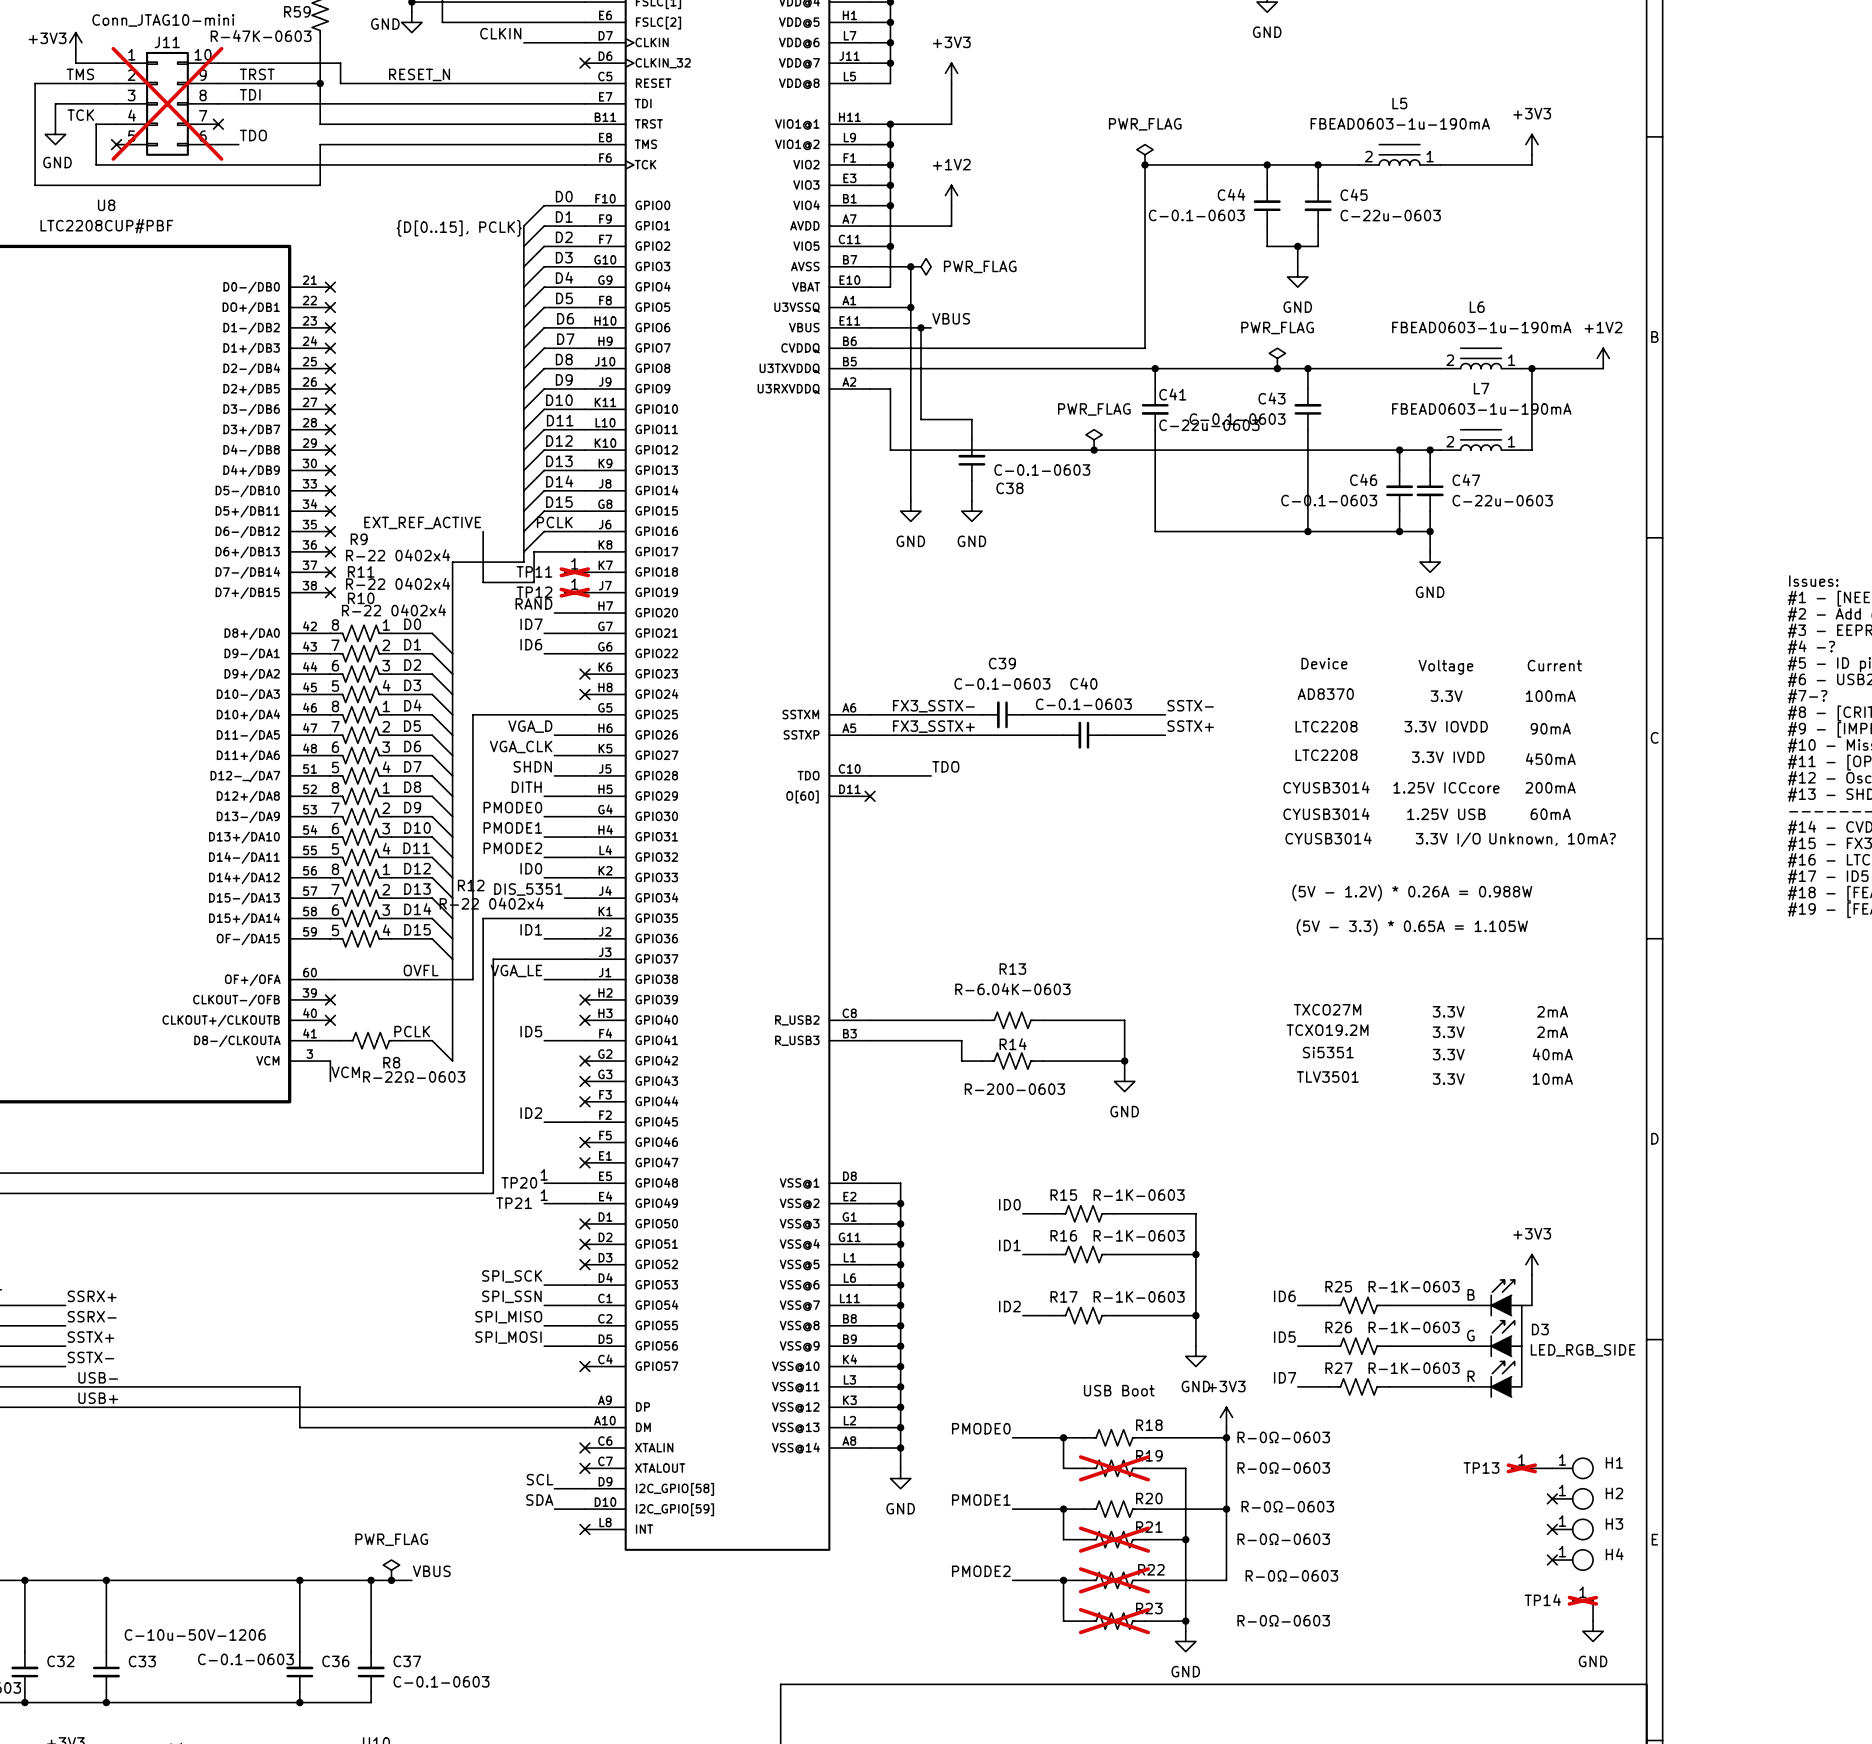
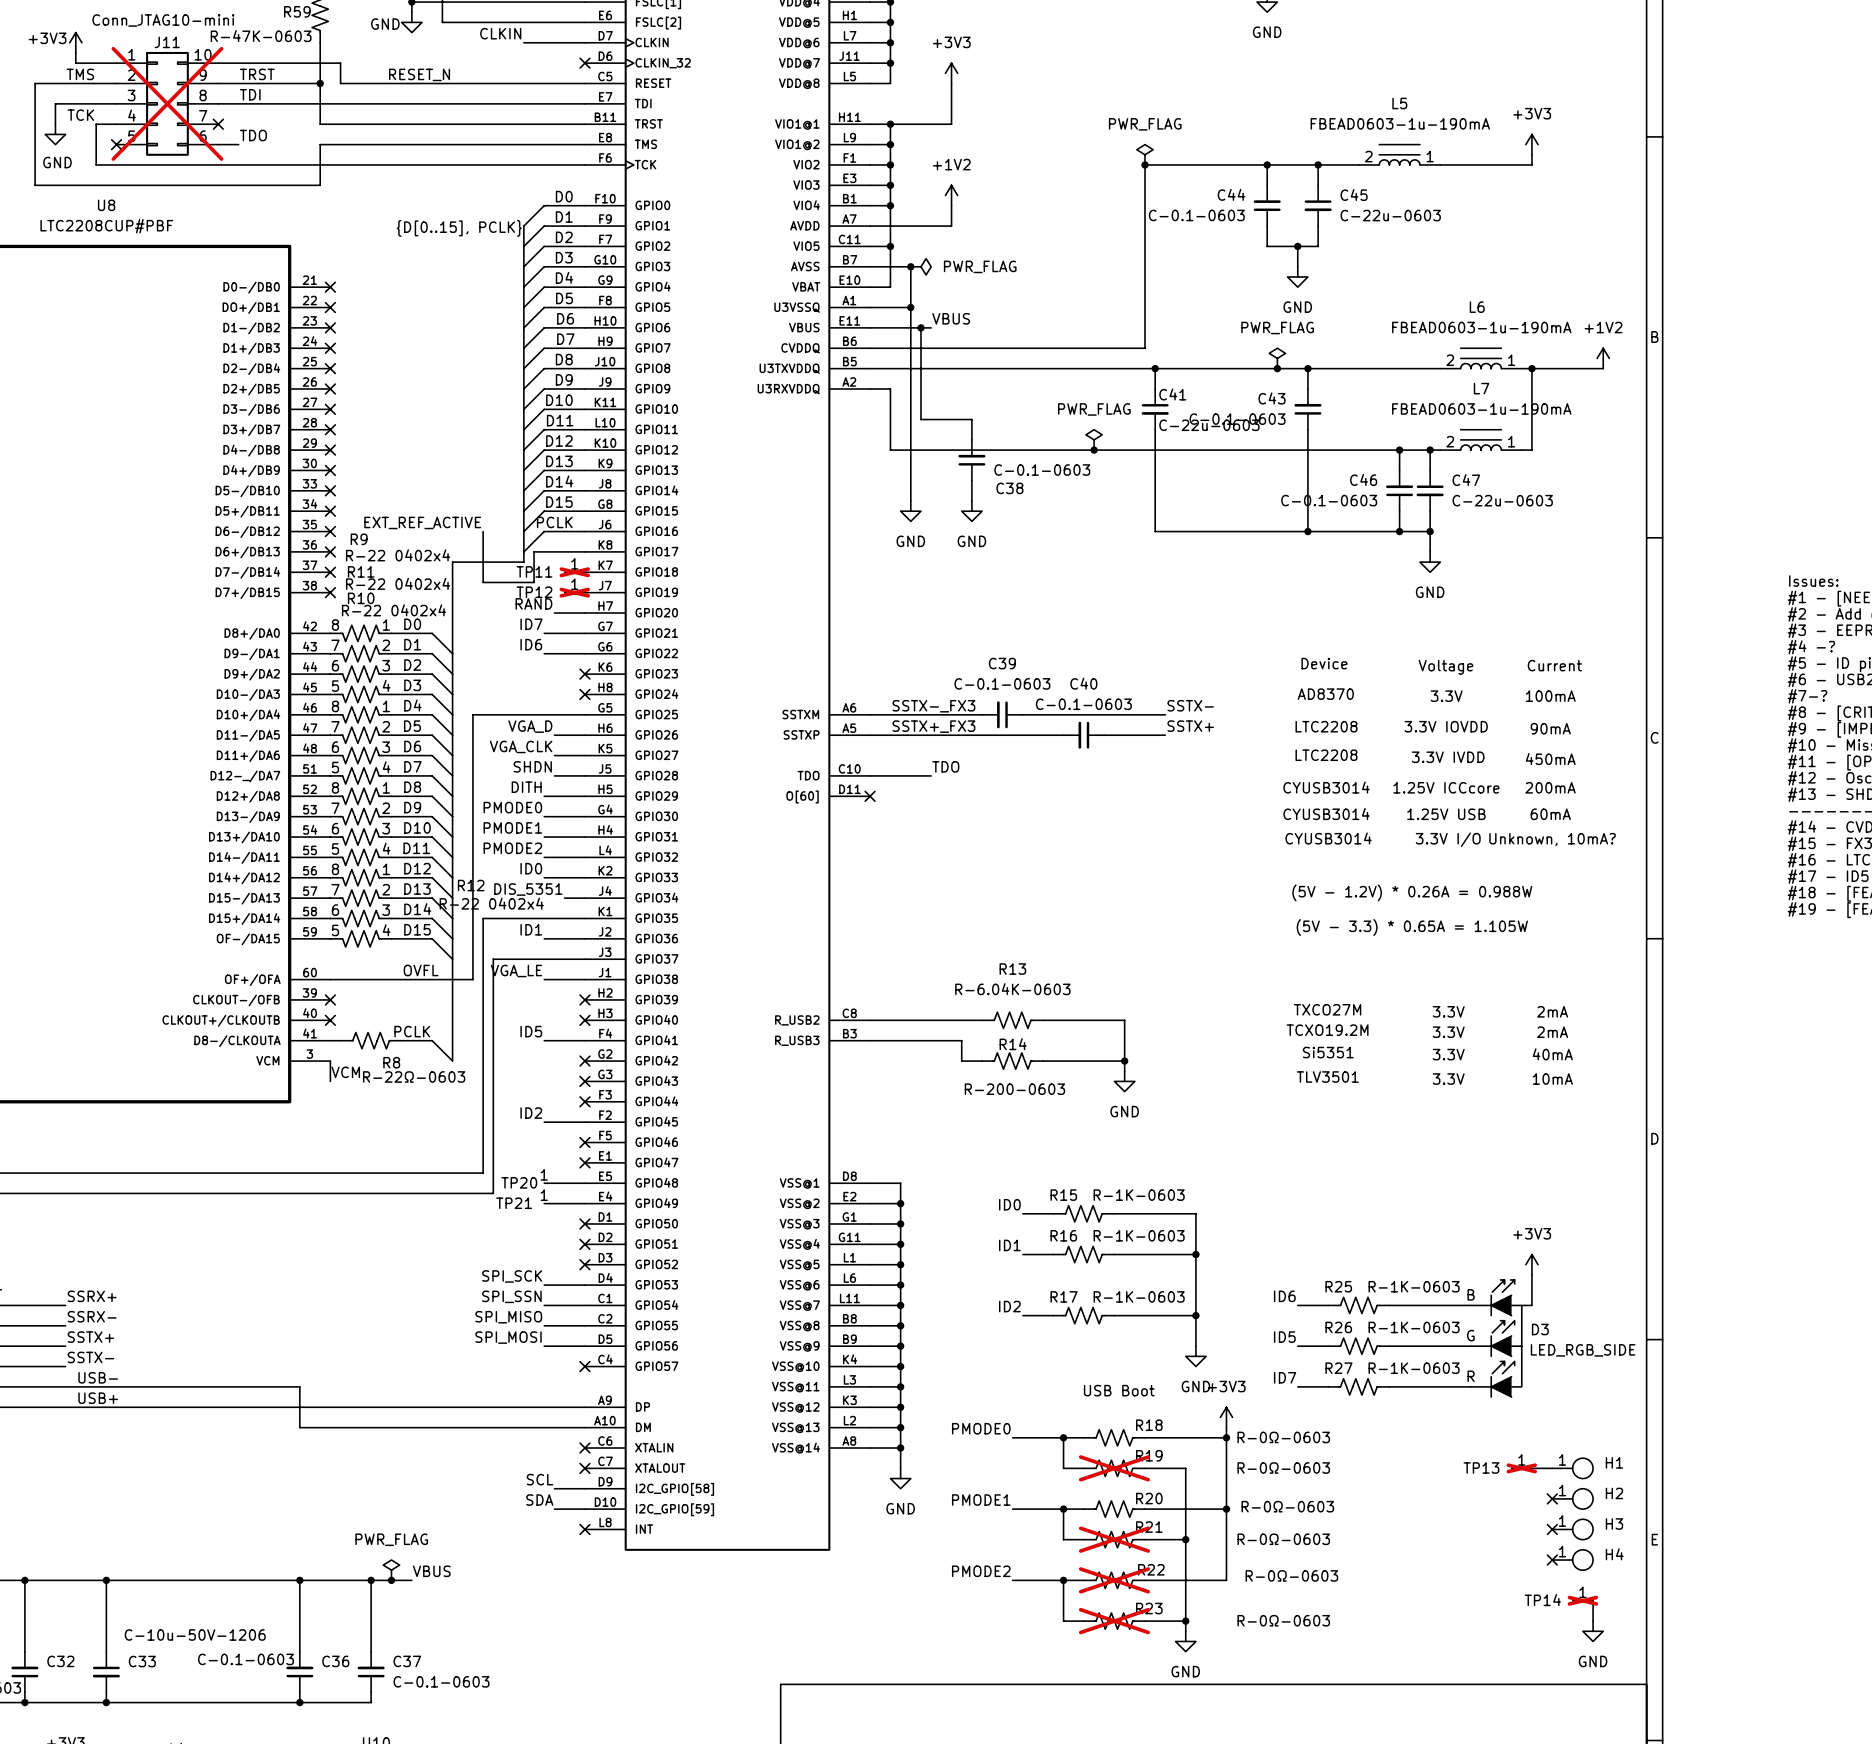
label: FX3_SSTX- (933, 706) -> SSTX-_FX3 (933, 706)
label: FX3_SSTX+ (933, 726) -> SSTX+_FX3 (933, 726)

